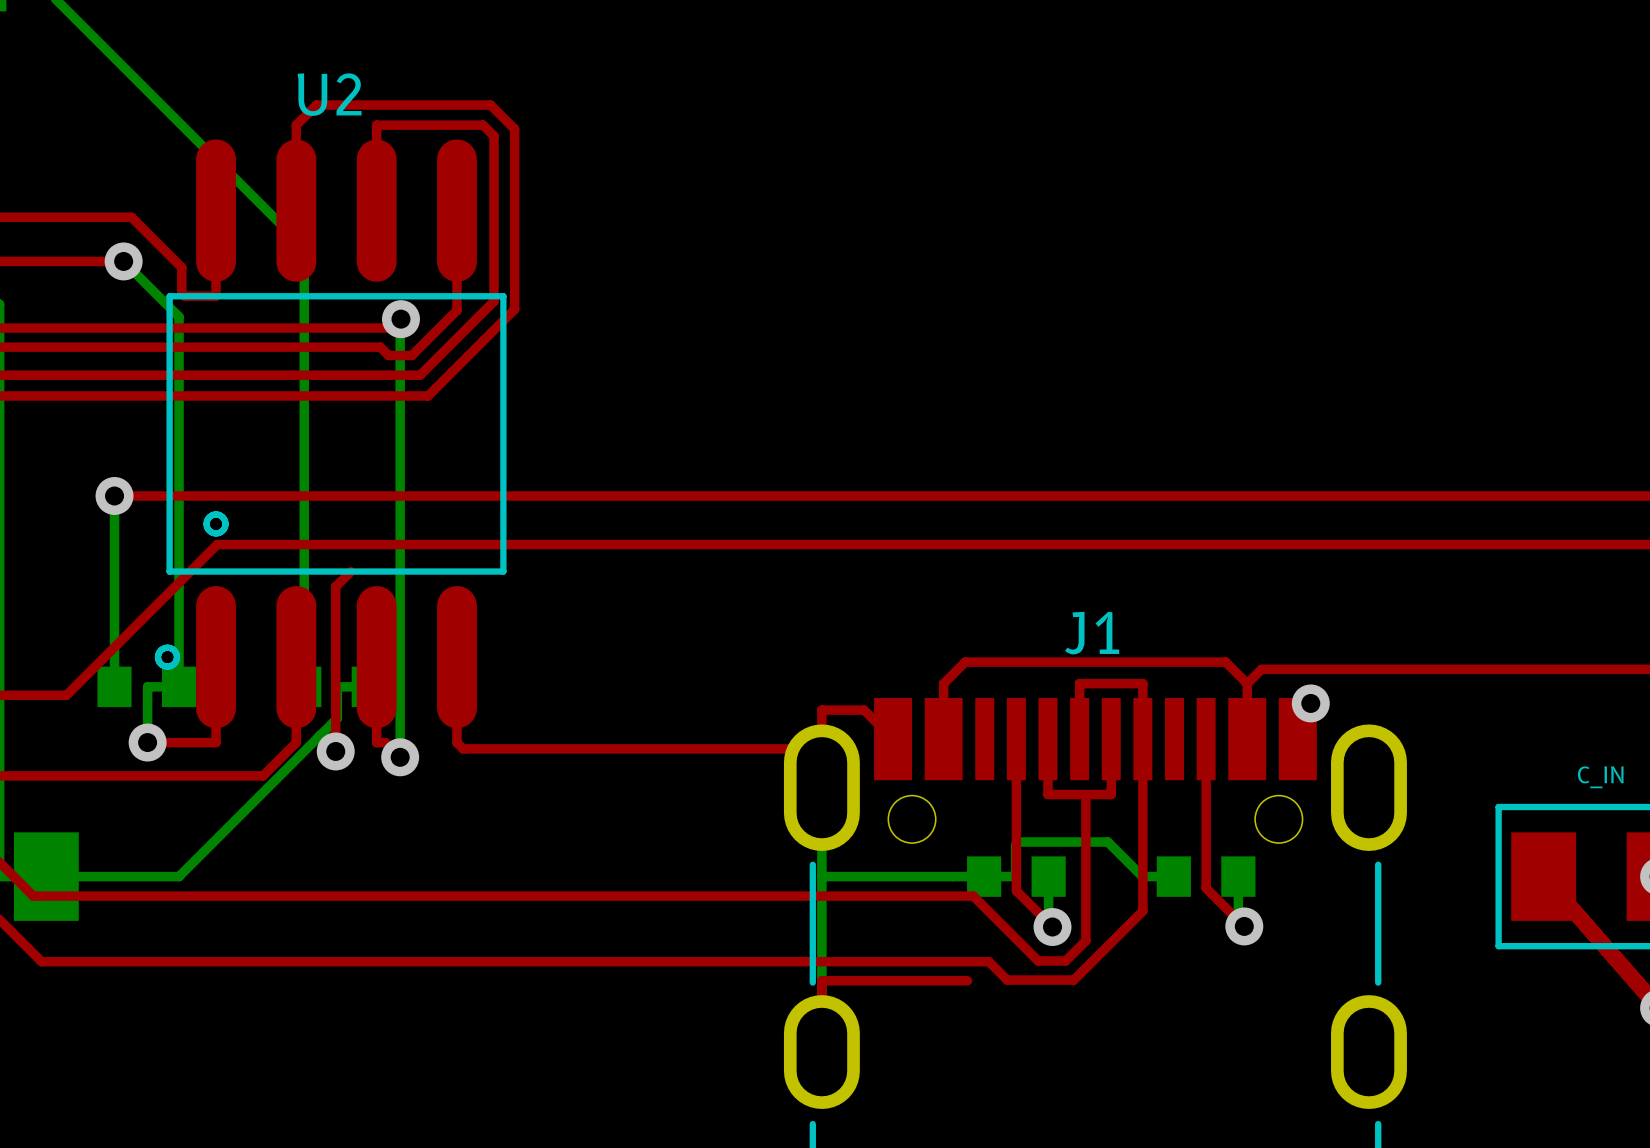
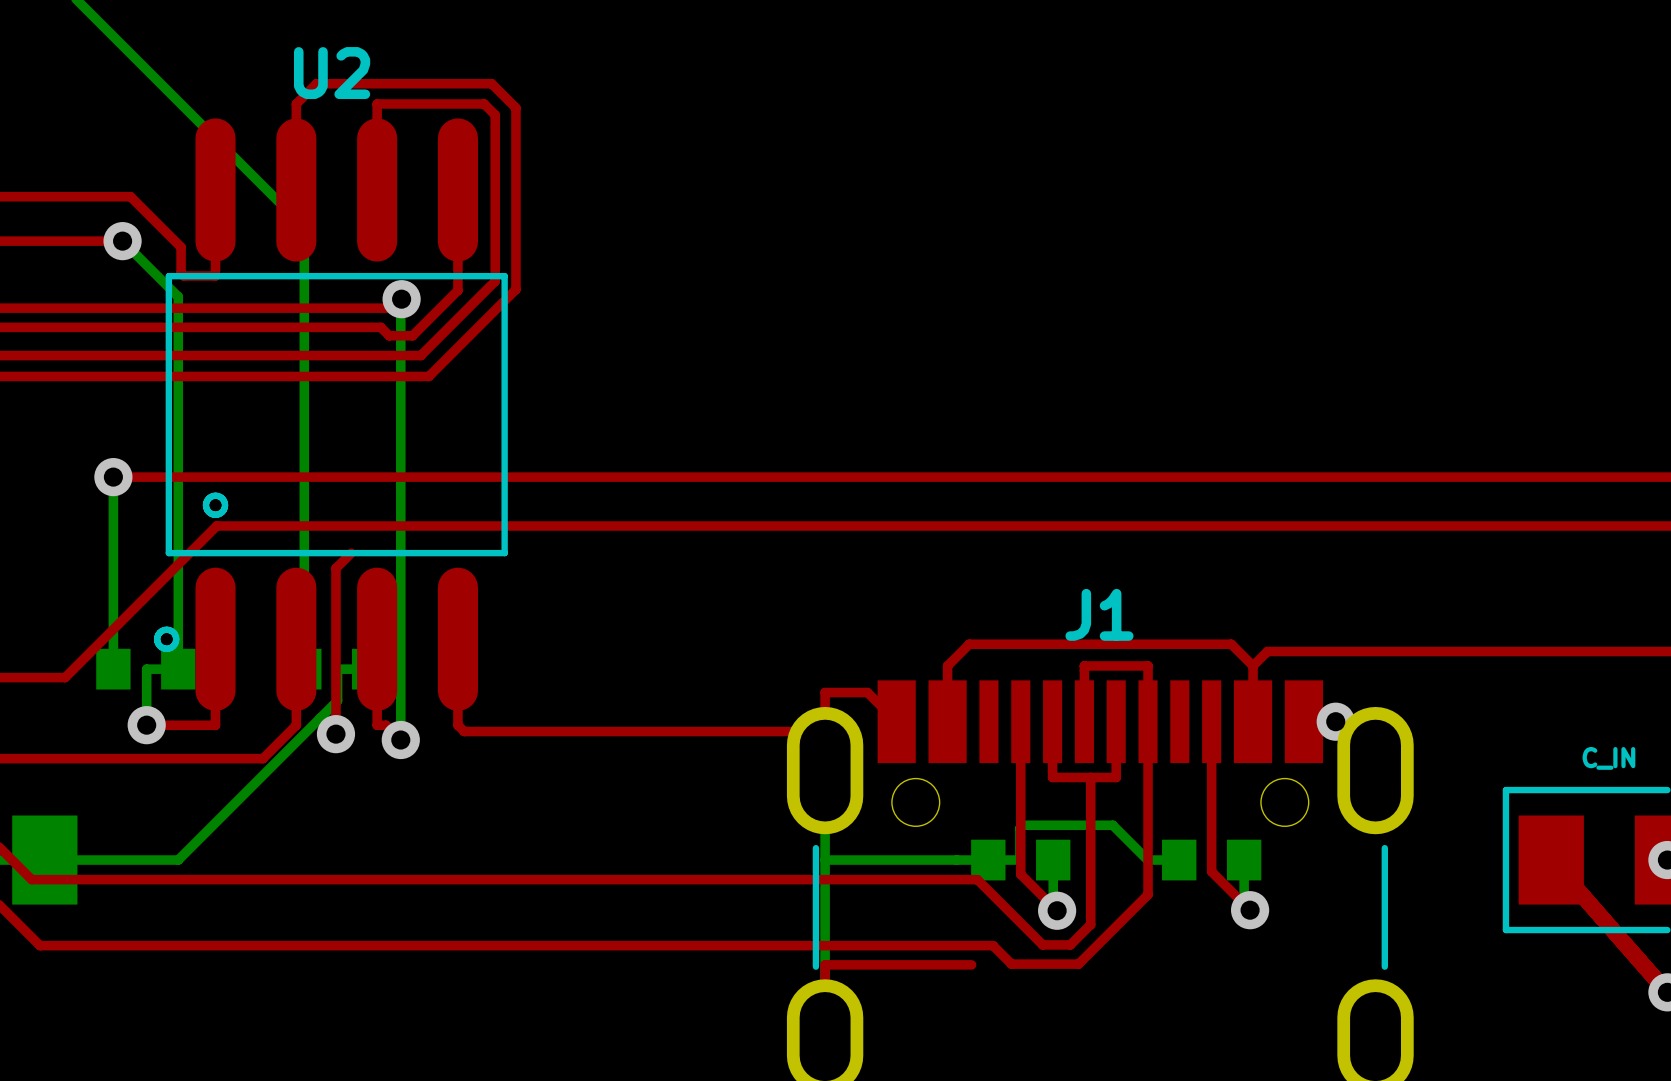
via position: (1310, 703) -> (1335, 721)

